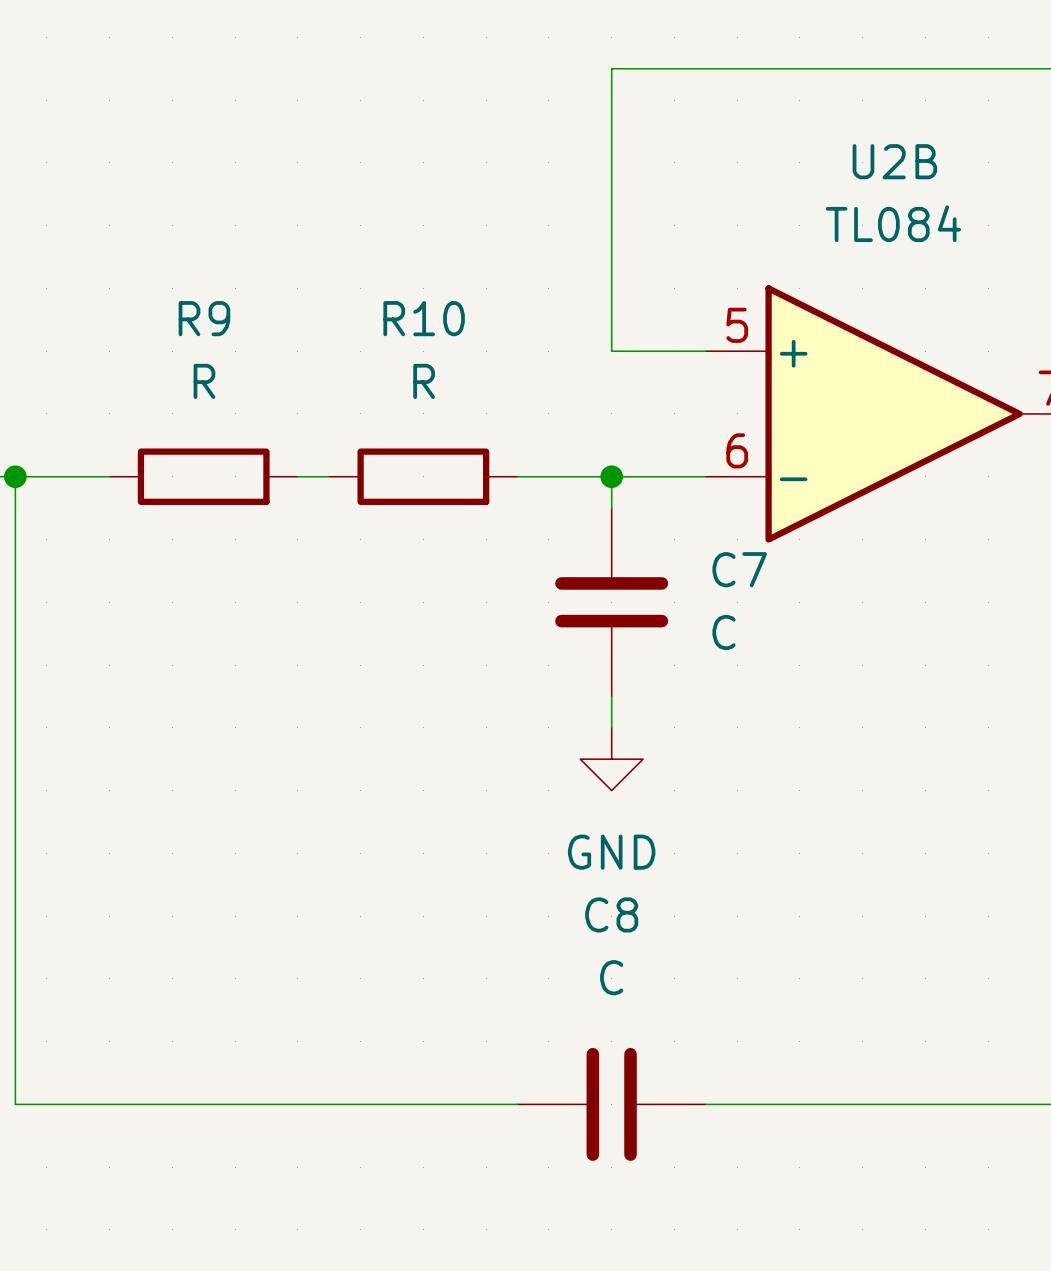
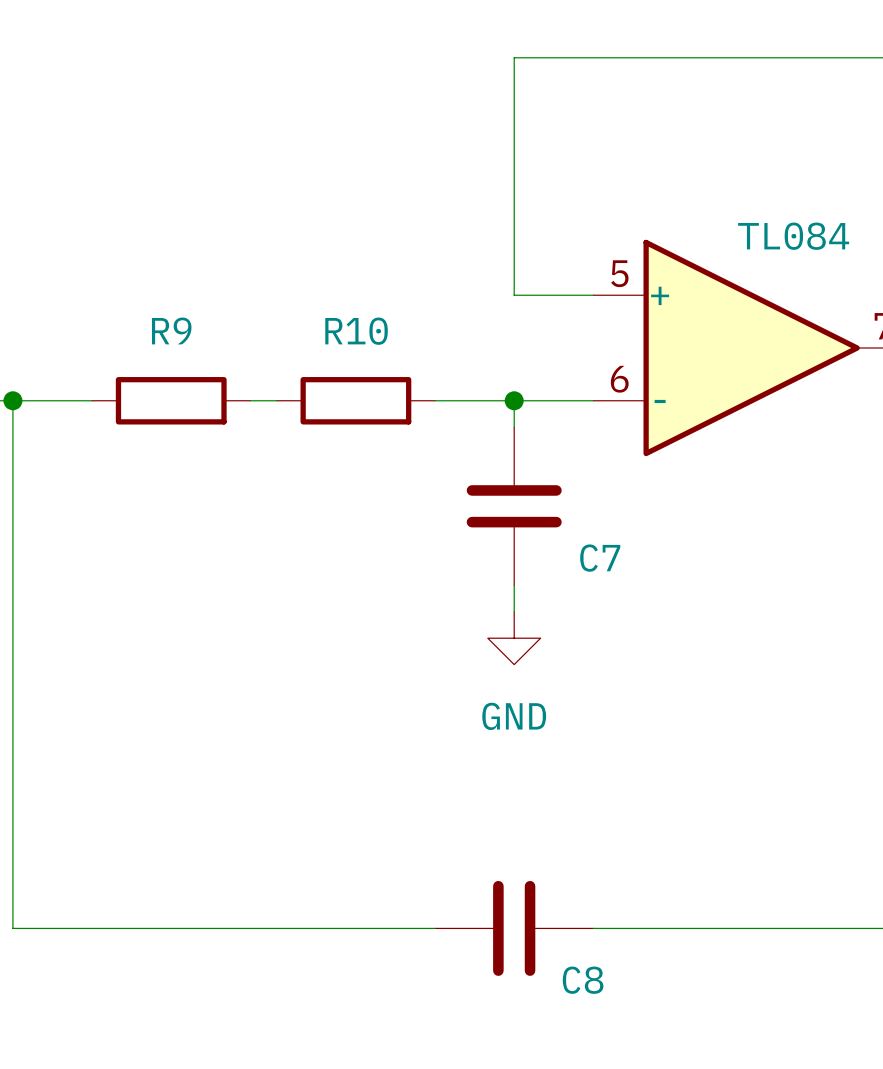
U2B name: U2B (894, 161) -> none
U2B value position: TL084 (893, 223) -> TL084 (793, 236)
R9 name position: R9 (204, 318) -> R9 (171, 330)
R10 name position: R10 (424, 318) -> R10 (356, 331)
R9 value: R (204, 381) -> none
R10 value: R (424, 381) -> none
C7 name position: C7 (739, 569) -> C7 (600, 558)
C7 value: C (723, 632) -> none
C8 name position: C8 (611, 914) -> C8 (583, 980)
C8 value: C (611, 977) -> none

